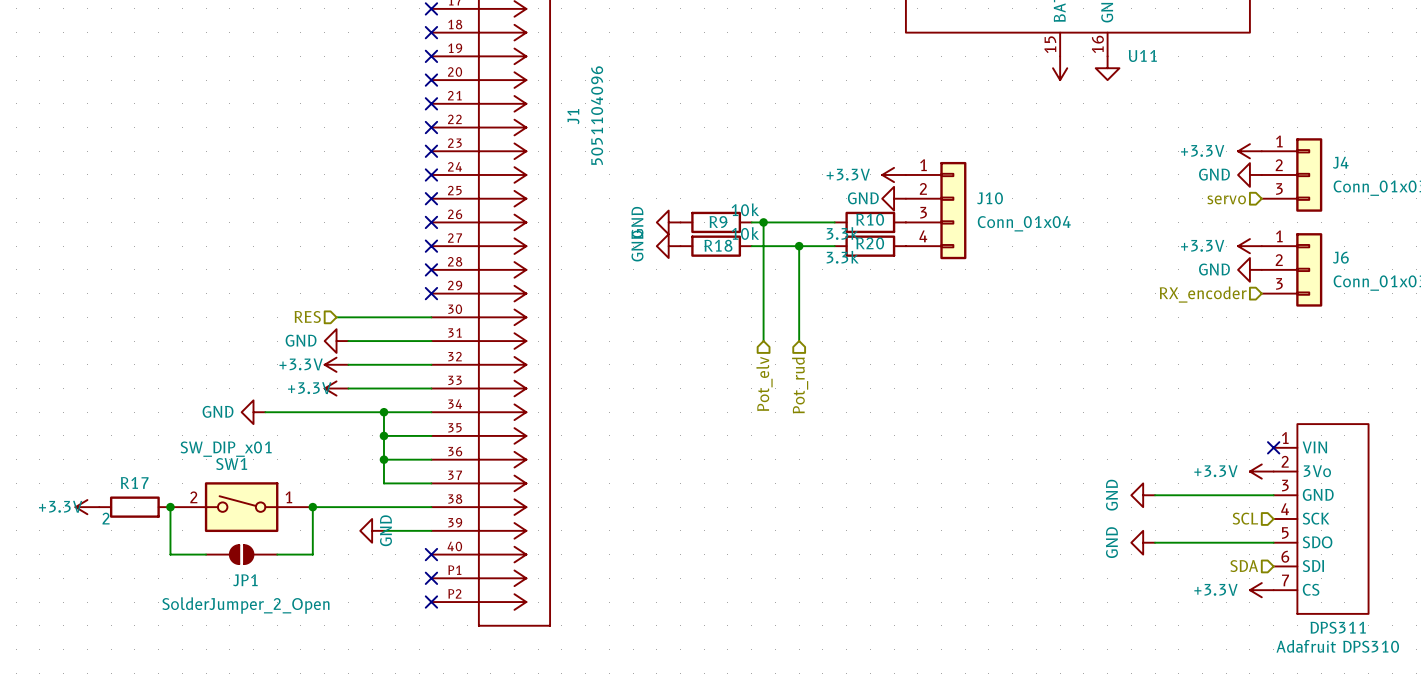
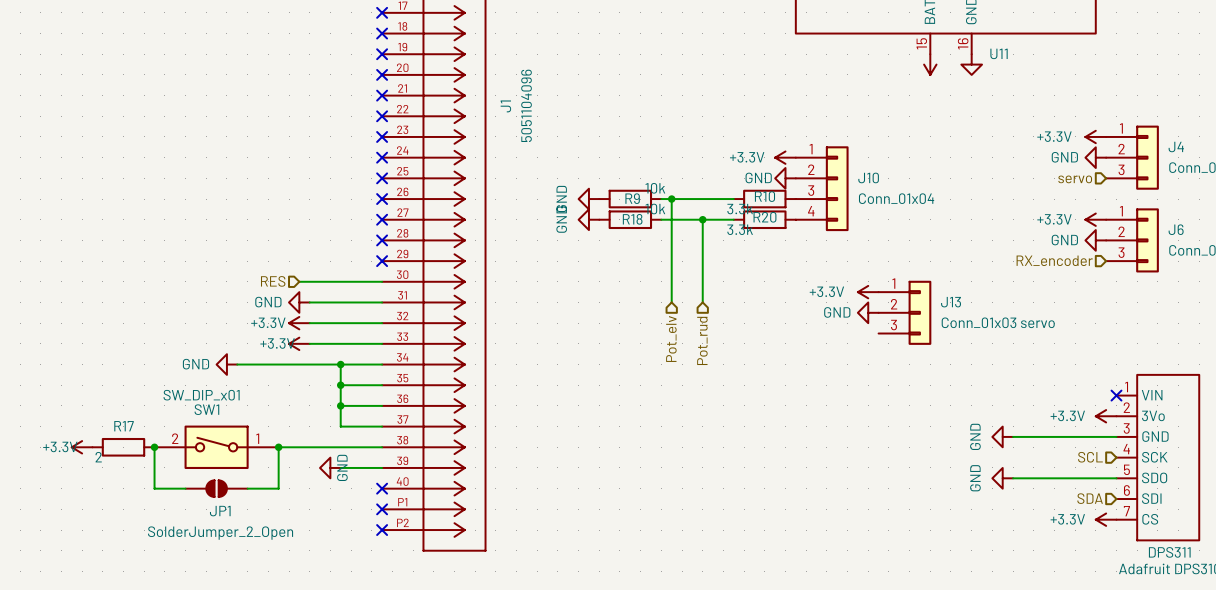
power symbol: none -> +3.3V (868, 292)
power symbol: none -> GND (868, 312)
J13: none -> Conn_01x03 servo (904, 312)

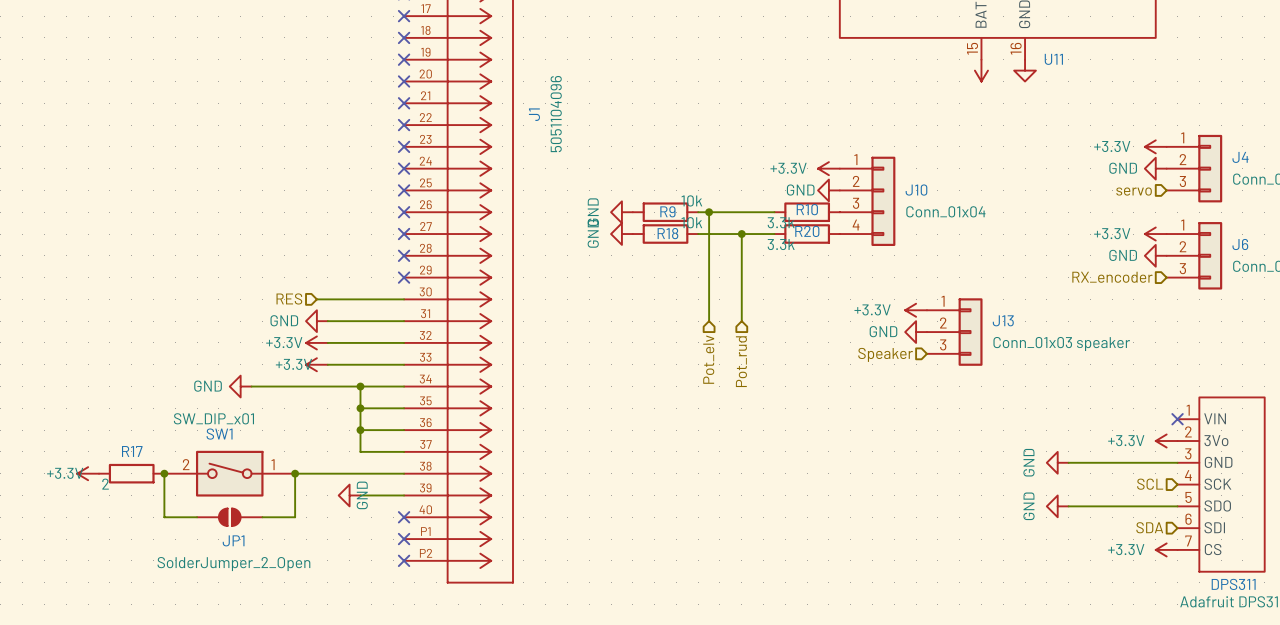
J13 value: Conn_01x03 servo (998, 322) -> Conn_01x03 speaker (1061, 343)
hierarchical label: none -> Speaker (885, 354)

